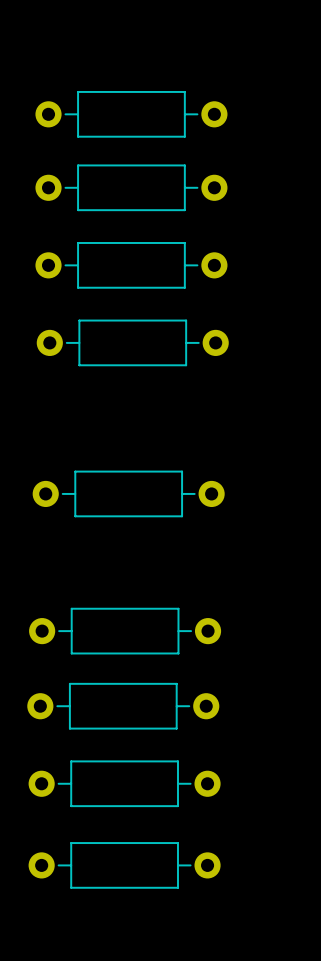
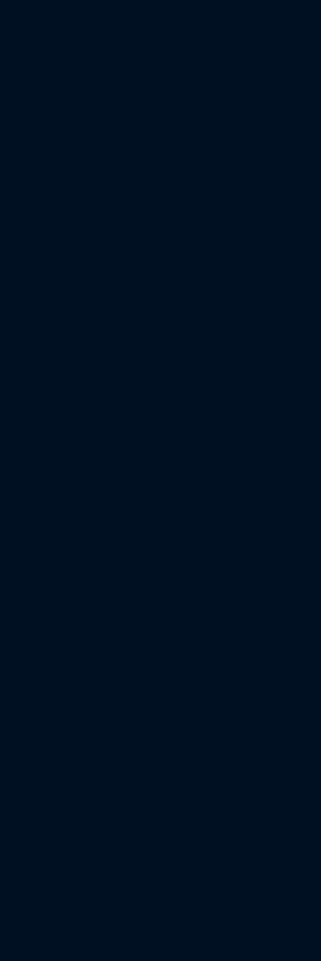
part: (131, 114) -> none
part: (131, 187) -> none
part: (131, 265) -> none
part: (132, 342) -> none
part: (128, 493) -> none
part: (125, 631) -> none
part: (123, 706) -> none
part: (124, 783) -> none
part: (124, 865) -> none

